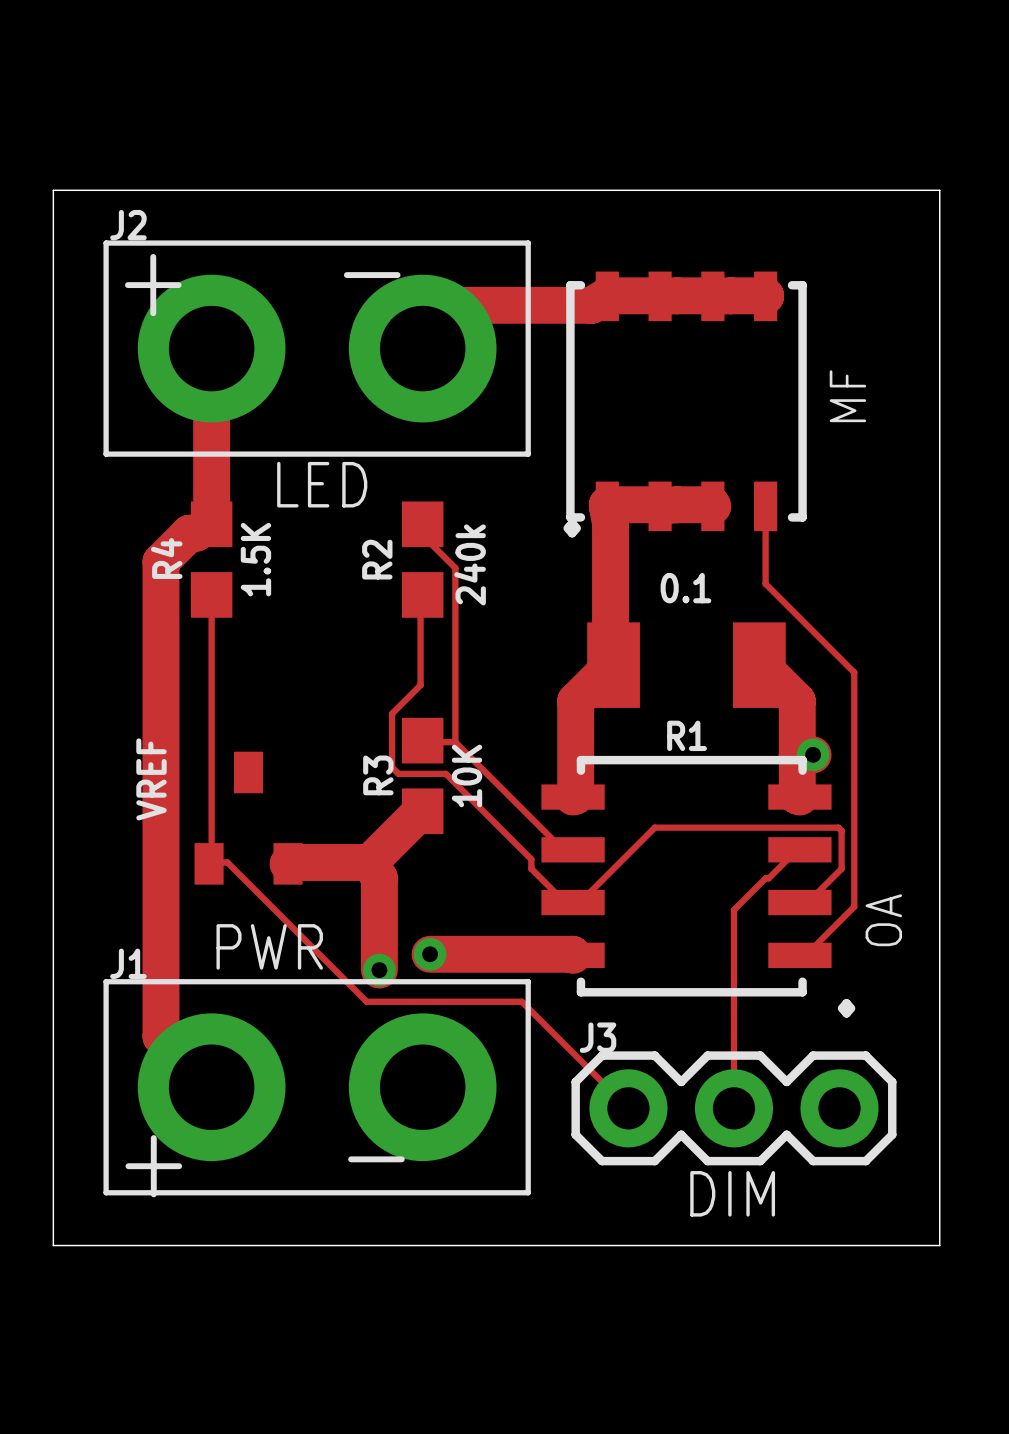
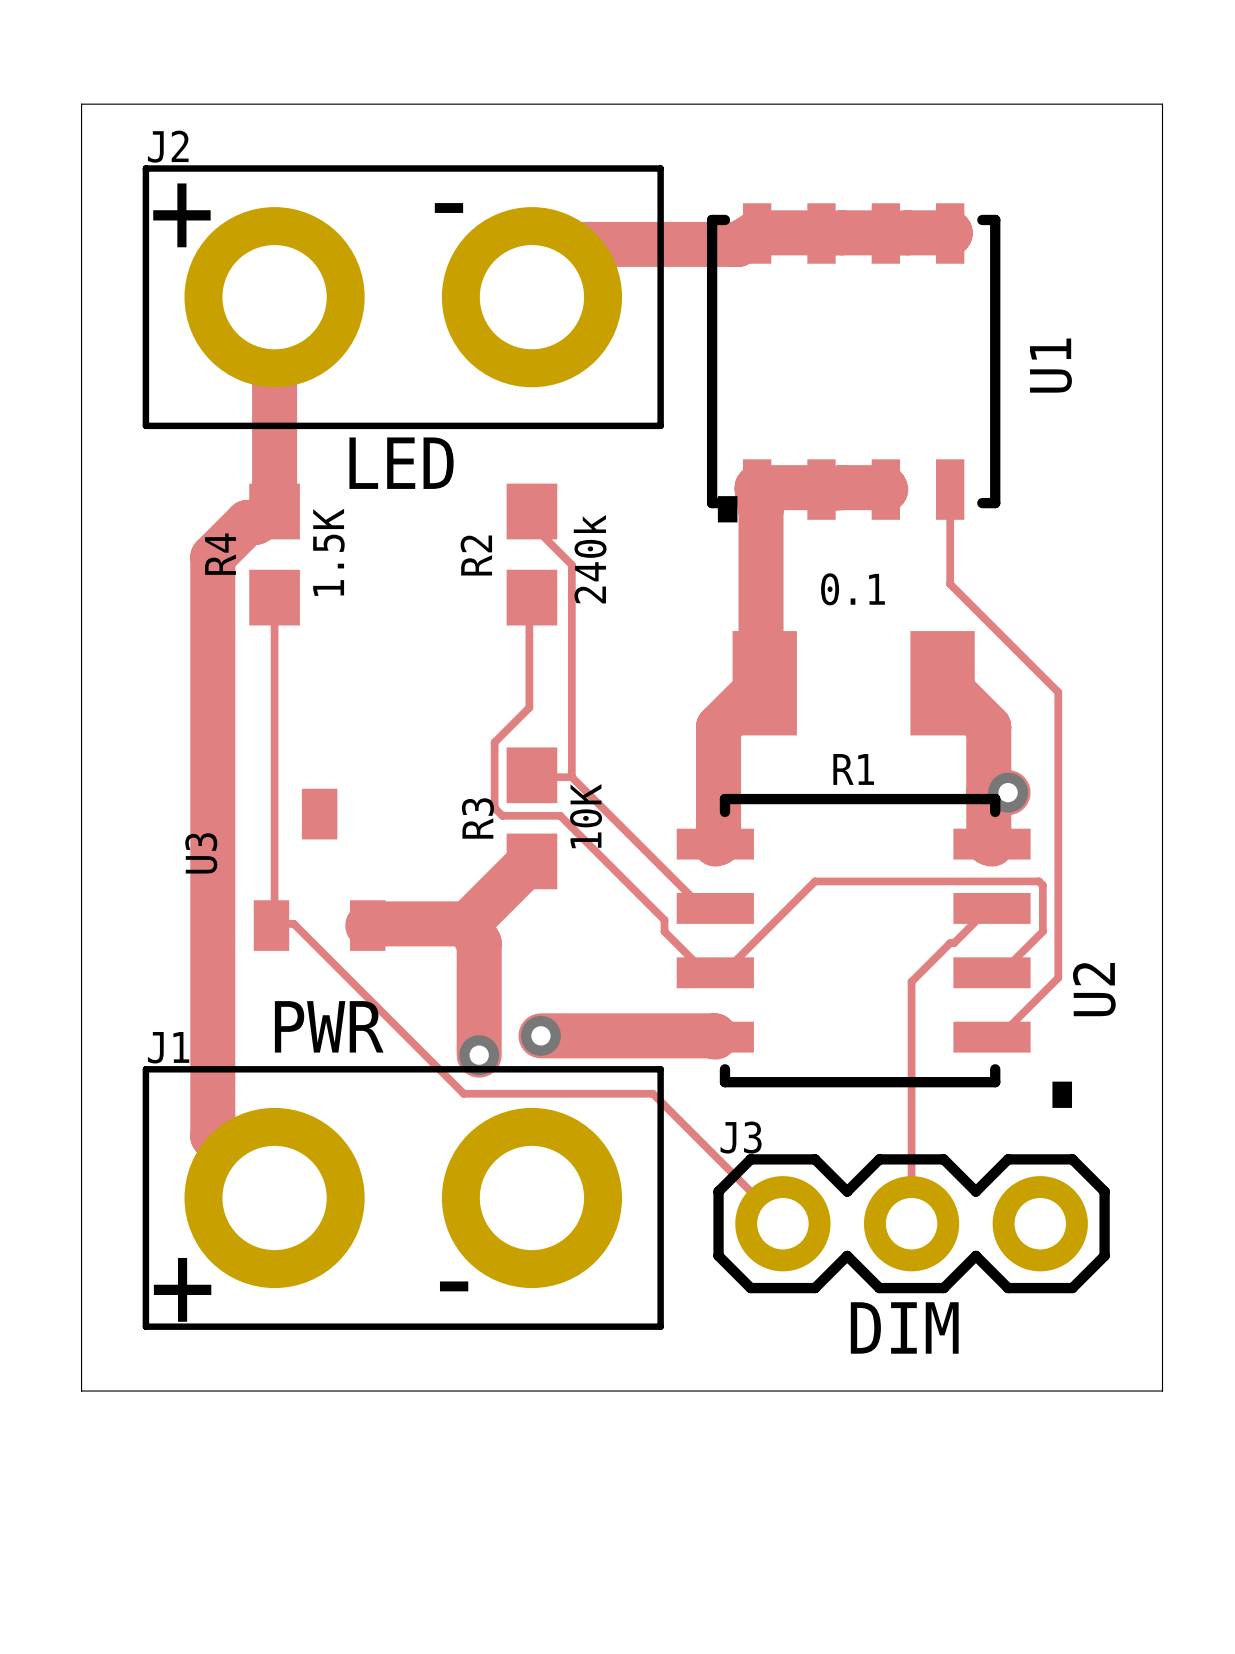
text: MF (847, 396) -> U1 (1050, 365)
text: VREF (151, 779) -> U3 (201, 853)
text: OA (883, 920) -> U2 (1094, 989)

